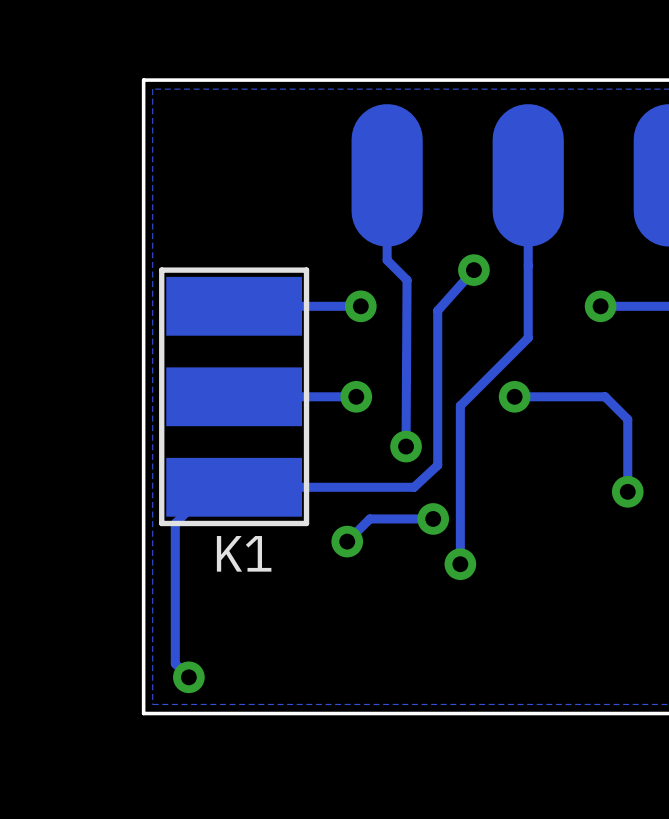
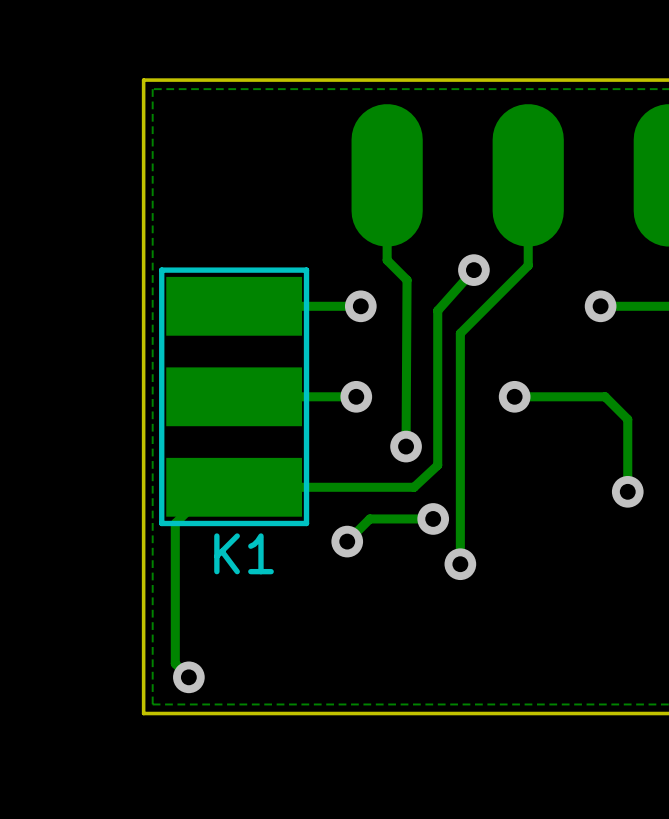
track: (528, 265) (528, 337) (460, 405) -> (528, 265) (460, 333) (460, 405)

